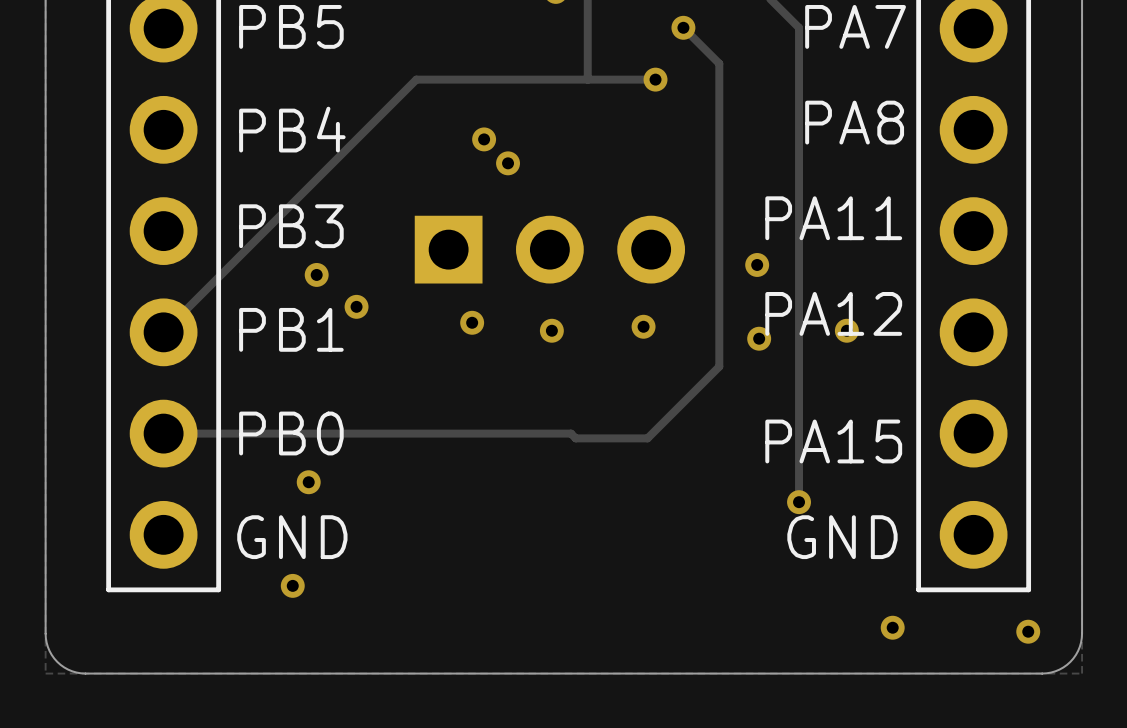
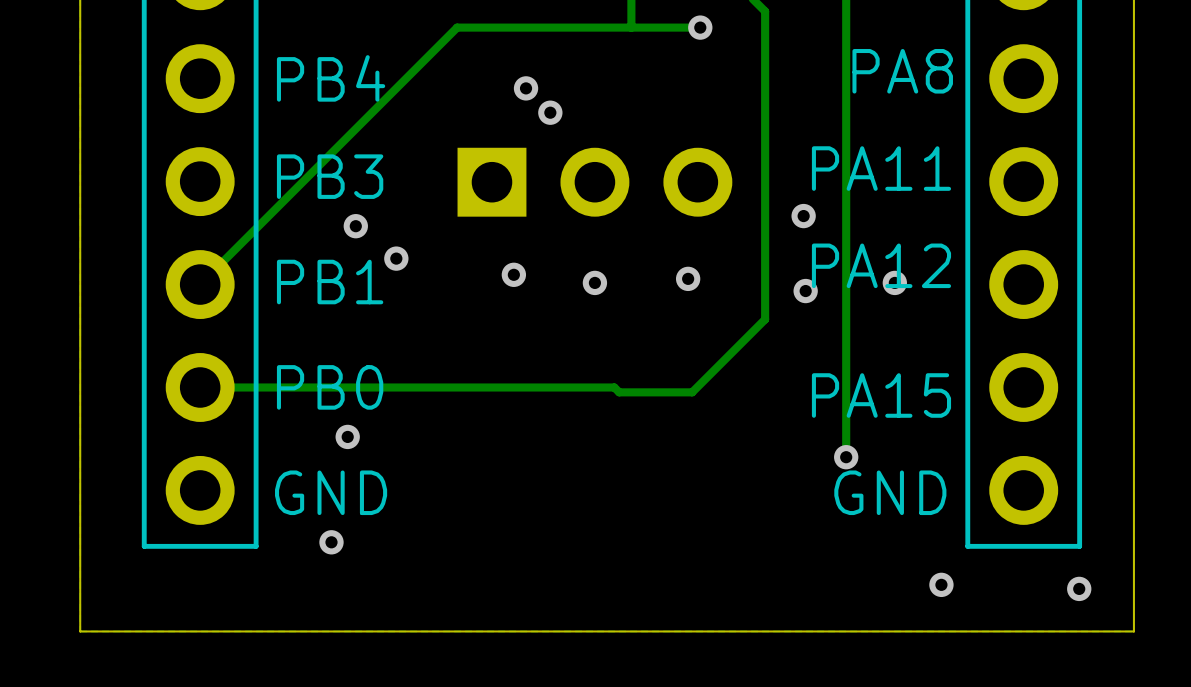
part position: (549, 249) -> (594, 182)
board edge: (45, 633) (49, 651) (57, 661) (68, 669) (85, 673) -> (80, 590) (80, 631) (120, 631)
board edge: (1082, 633) (1078, 651) (1070, 661) (1055, 671) (1042, 673) -> (1133, 590) (1133, 631) (1093, 631)

